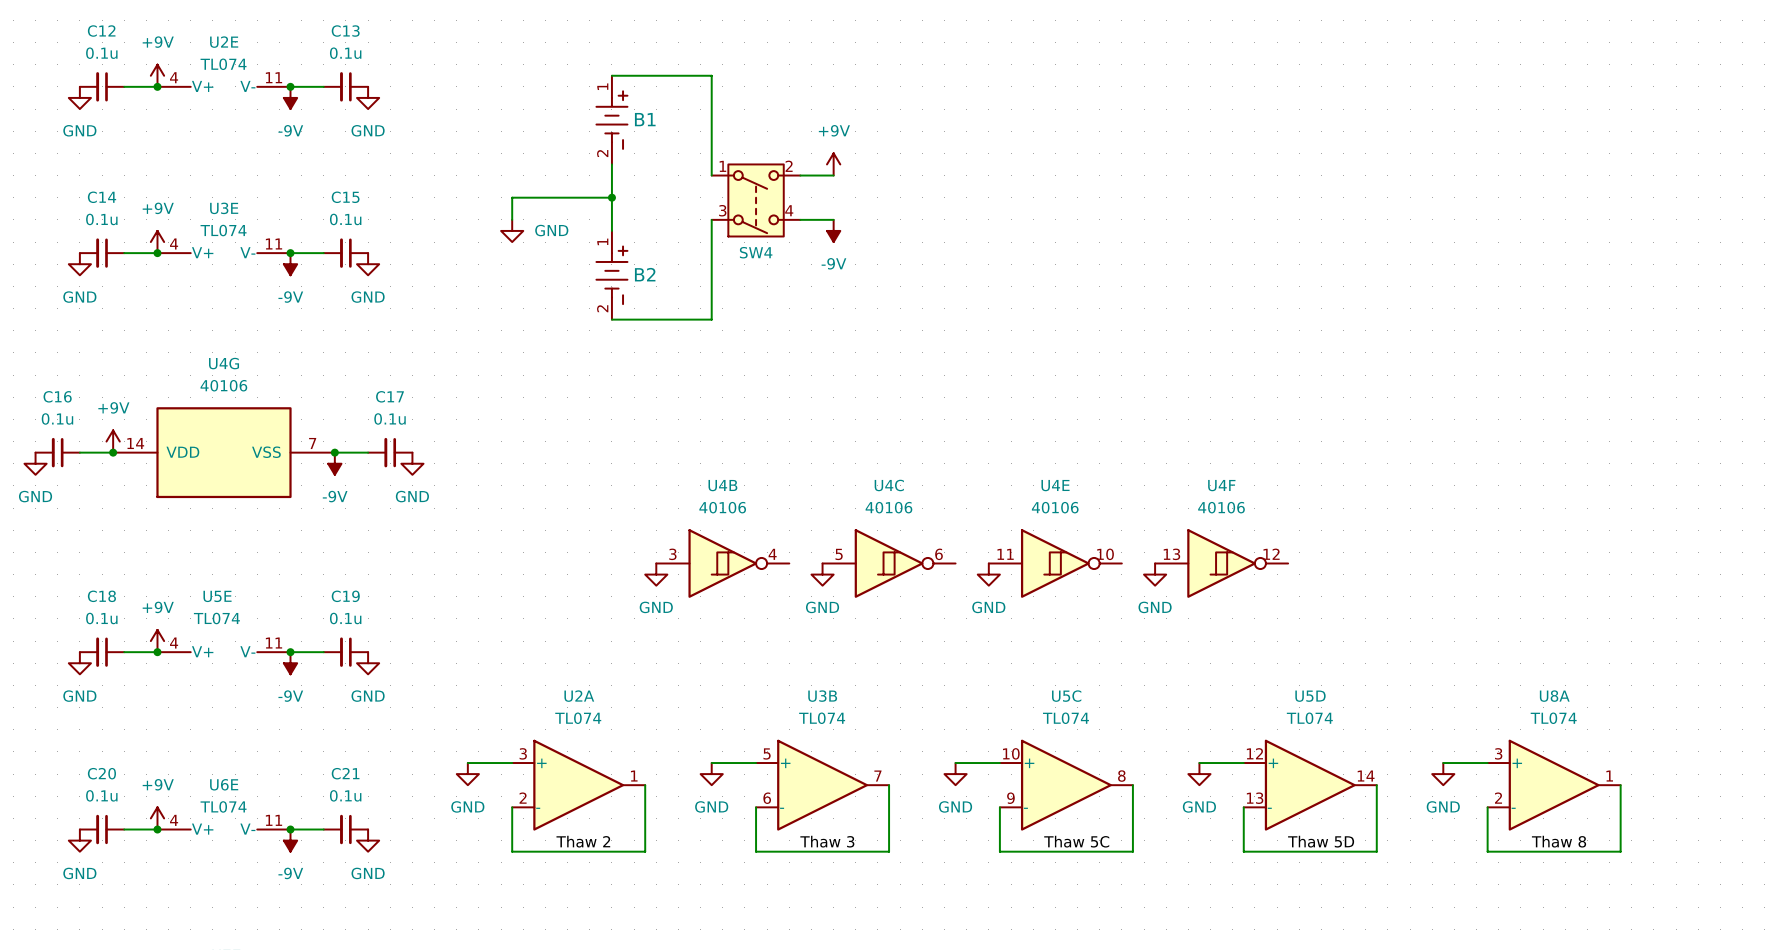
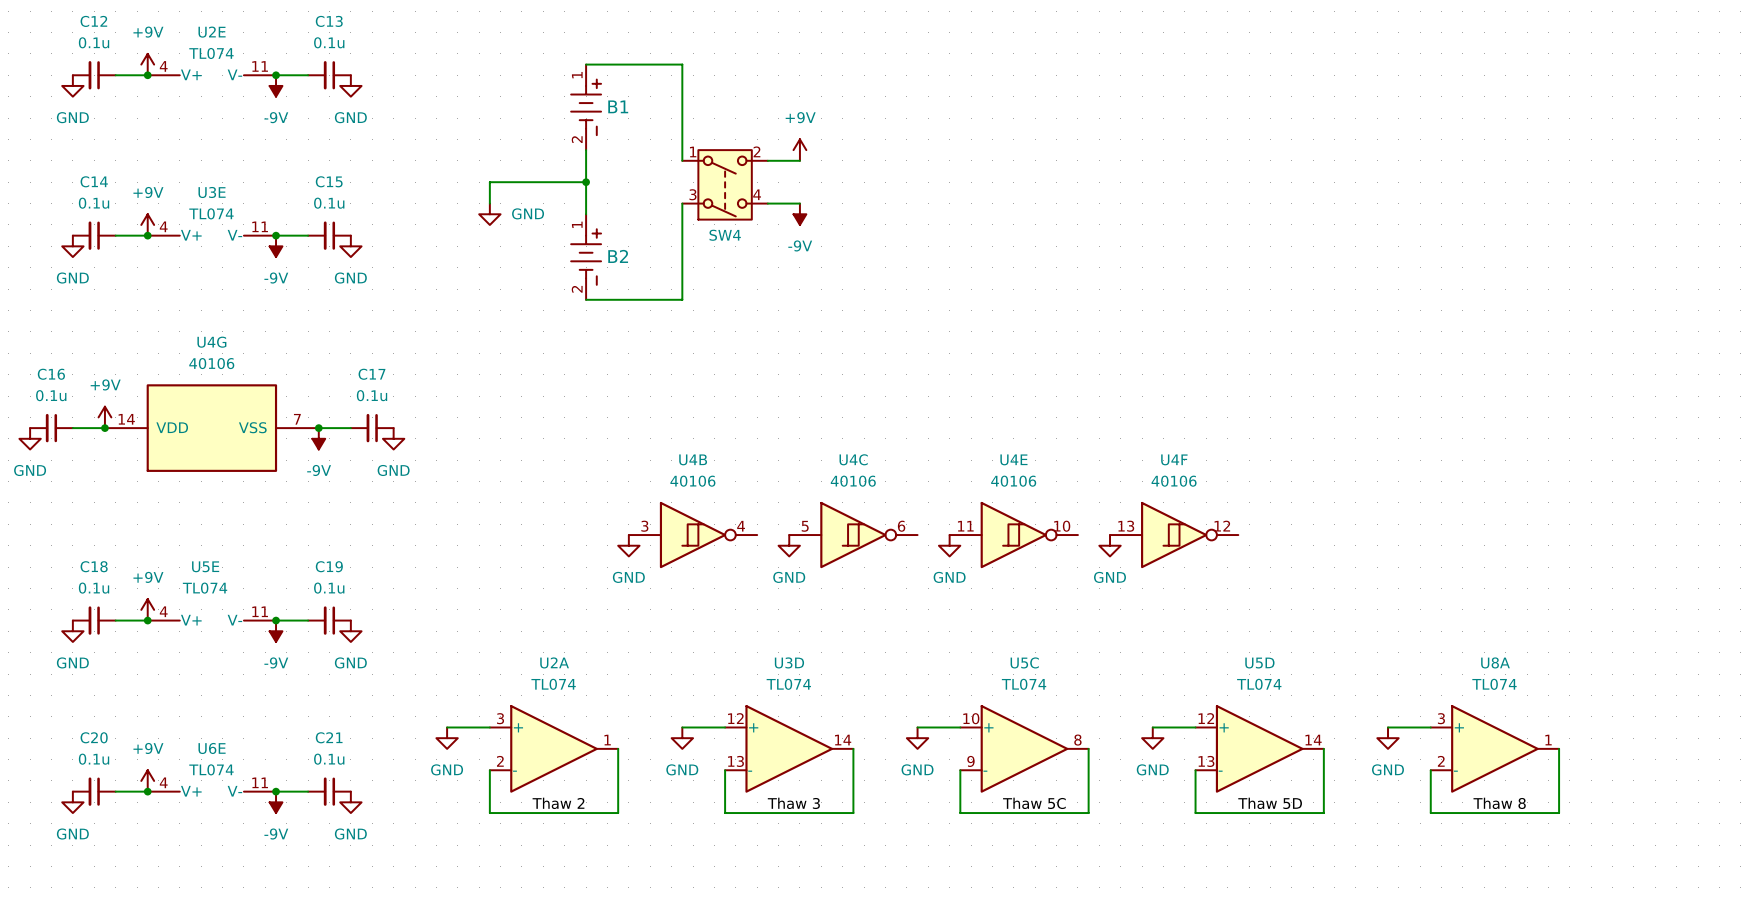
U3B name: U3B (822, 696) -> U3D (789, 662)
U3B pin number: 5 (767, 753) -> 12 (735, 718)
U3B pin number: 7 (877, 776) -> 14 (843, 740)
U3B pin number: 6 (767, 798) -> 13 (736, 761)

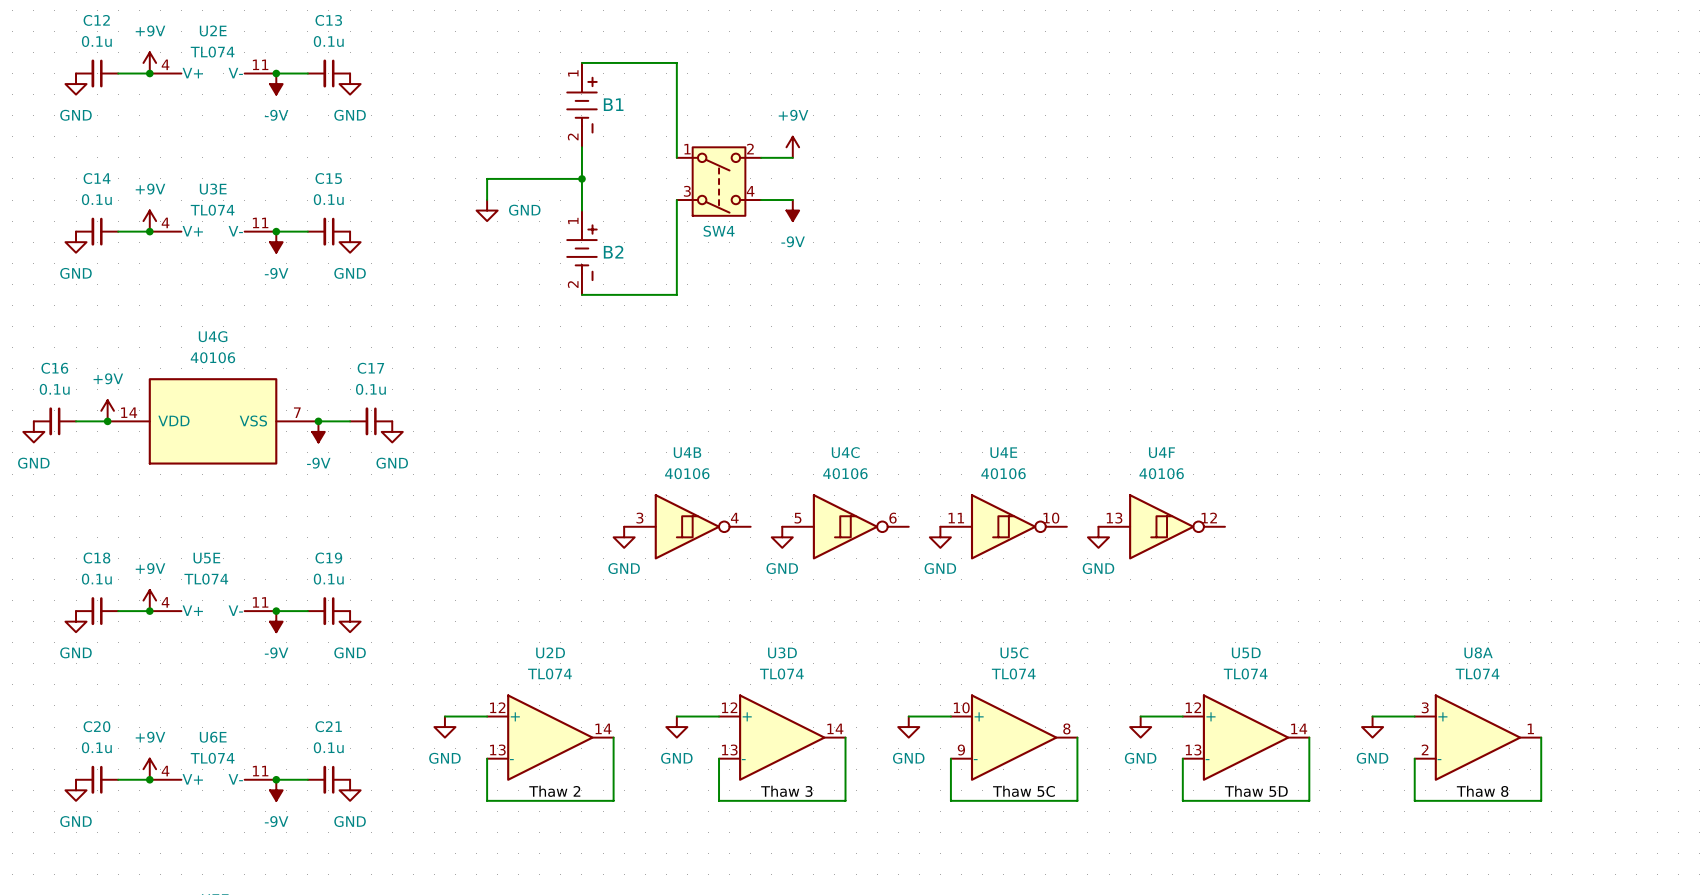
U2A name: U2A (554, 662) -> U2D (550, 652)
U2A pin number: 3 (500, 718) -> 12 (497, 707)
U2A pin number: 1 (607, 740) -> 14 (603, 728)
U2A pin number: 2 (500, 761) -> 13 (497, 750)

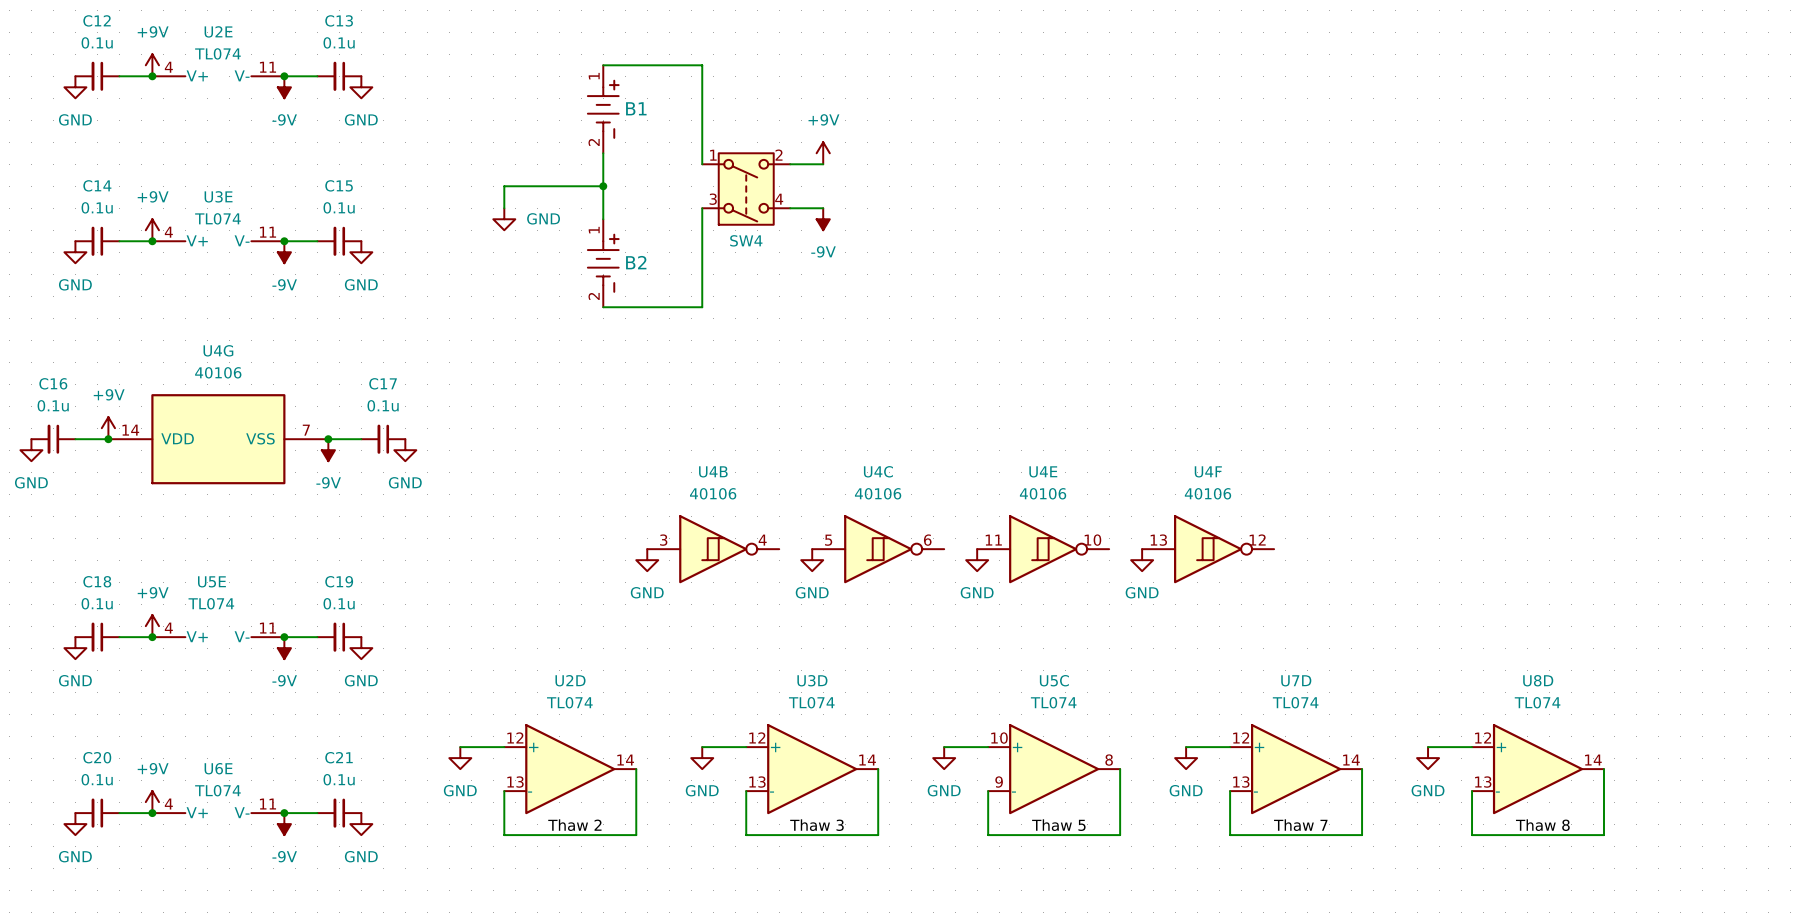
U5D name: U5D (1246, 652) -> U7D (1296, 680)
U8A name: U8A (1478, 652) -> U8D (1538, 680)
U8A pin number: 3 (1425, 707) -> 12 (1483, 737)
U8A pin number: 1 (1530, 728) -> 14 (1593, 760)
U8A pin number: 2 (1425, 749) -> 13 (1483, 782)
label: Thaw 5C (1023, 791) -> Thaw 5 (1058, 825)
label: Thaw 5D (1256, 791) -> Thaw 7 (1300, 825)

